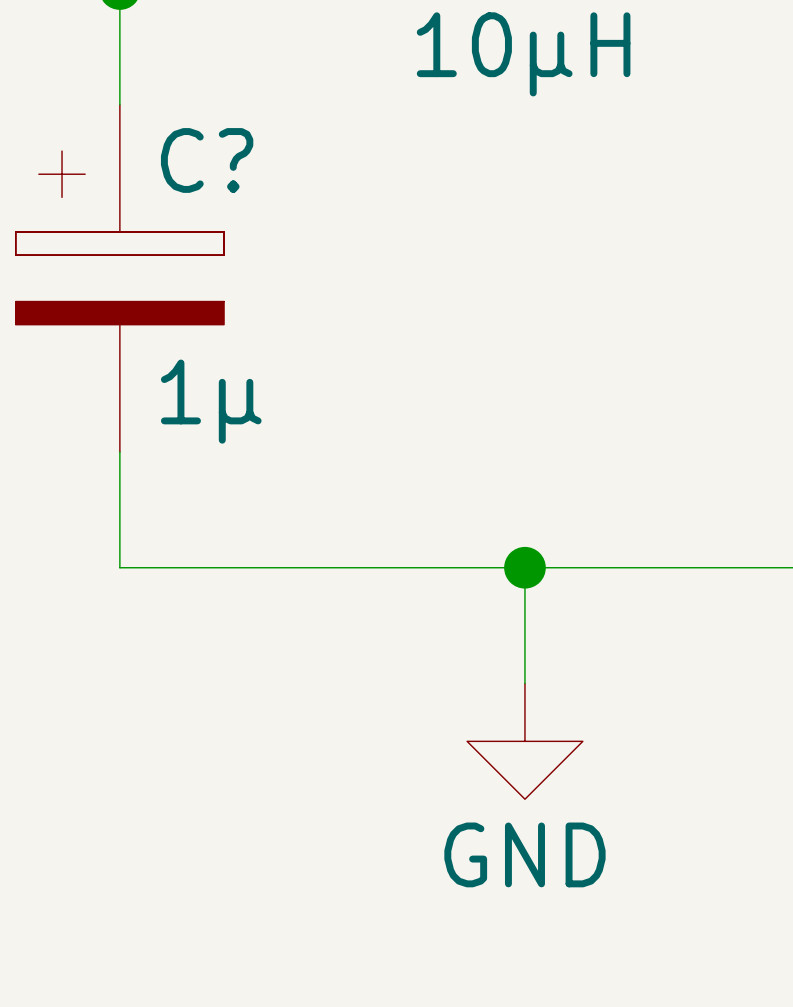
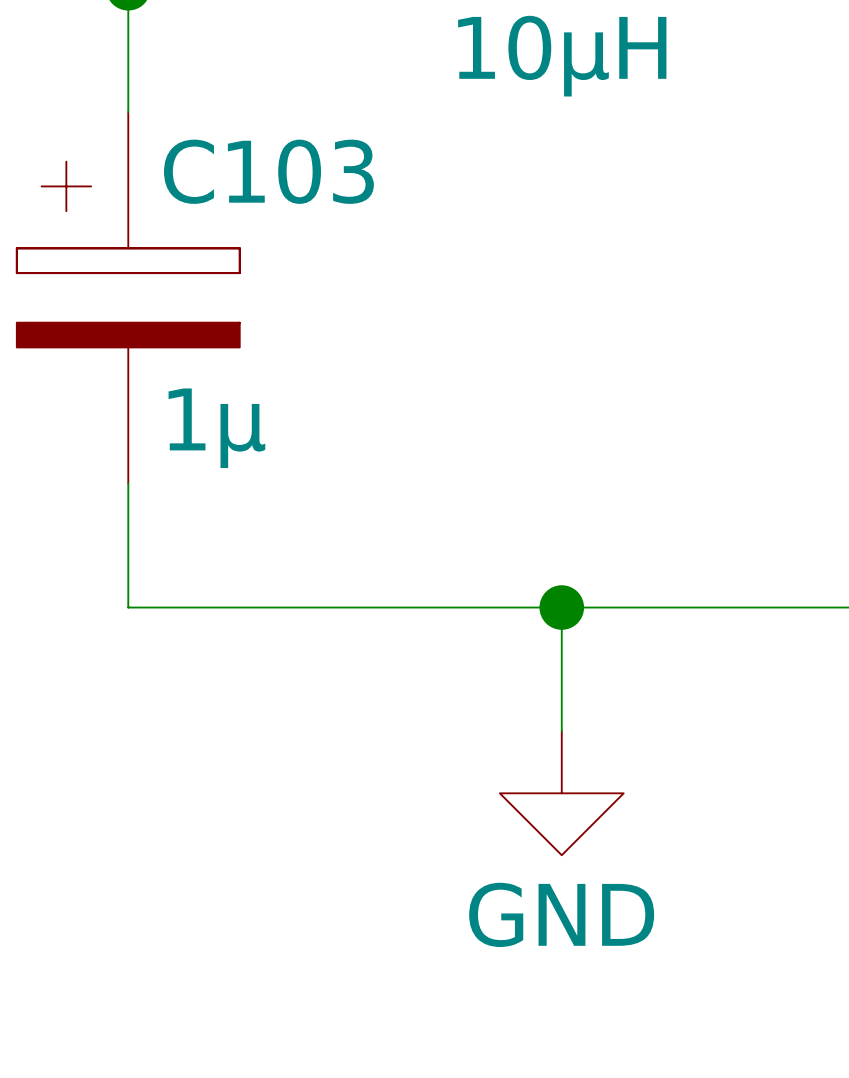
C? name: C? (207, 160) -> C103 (268, 171)

